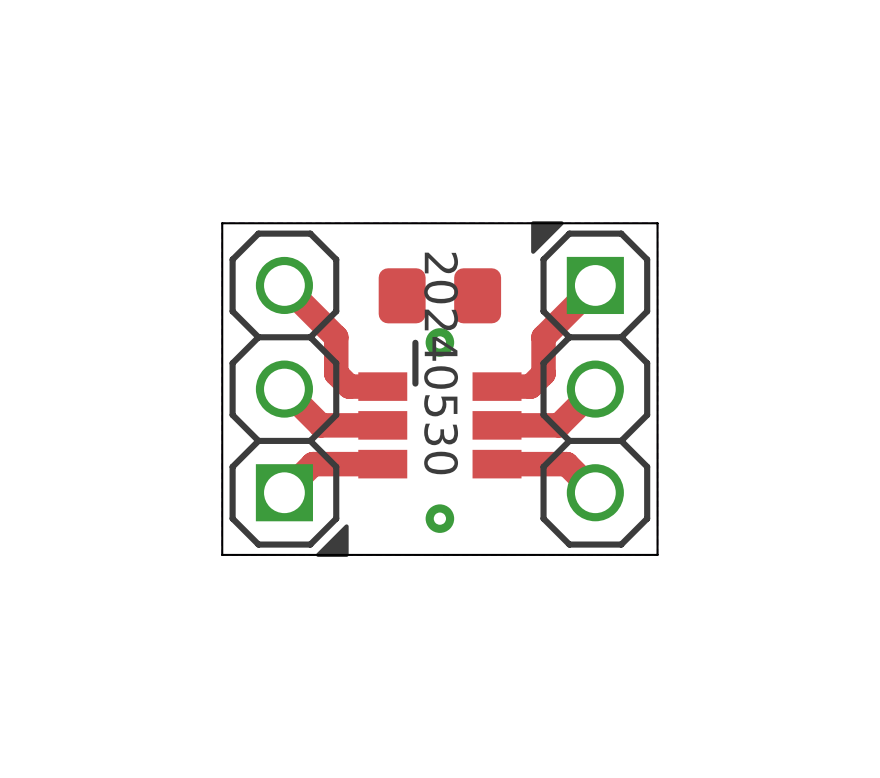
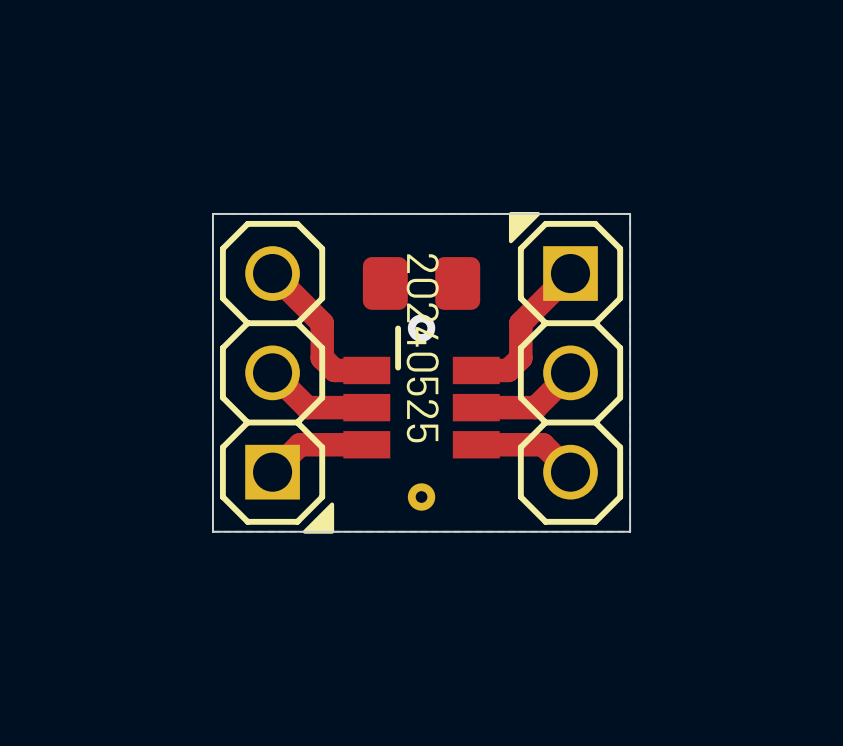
drawing shape: [412, 252, 459, 475] -> [395, 254, 439, 443]

